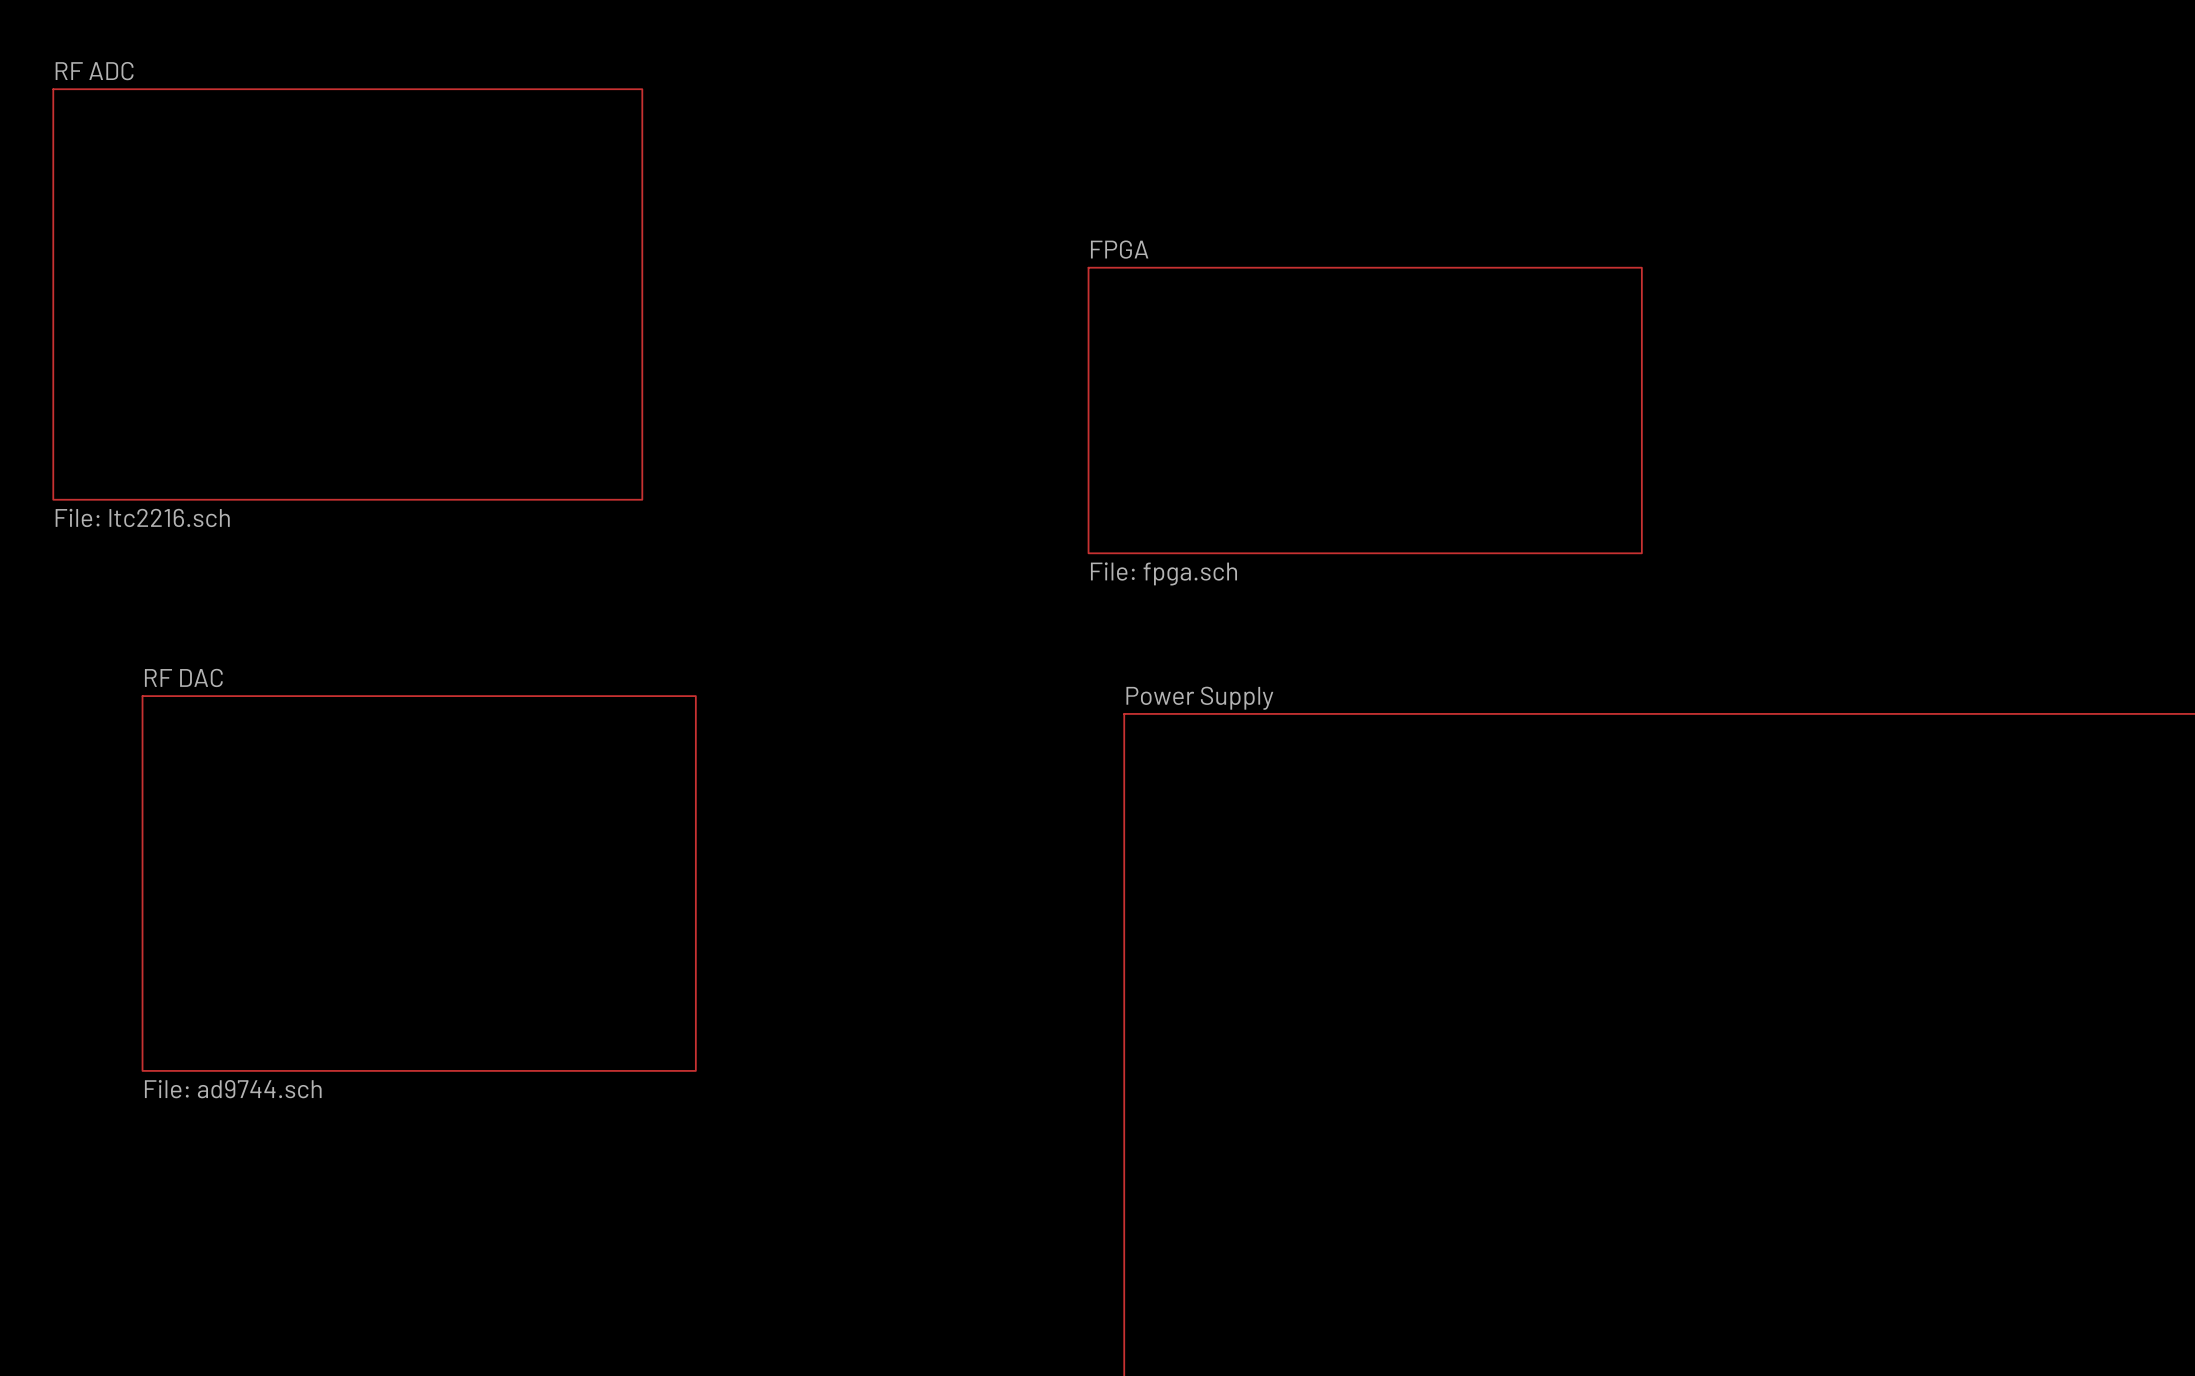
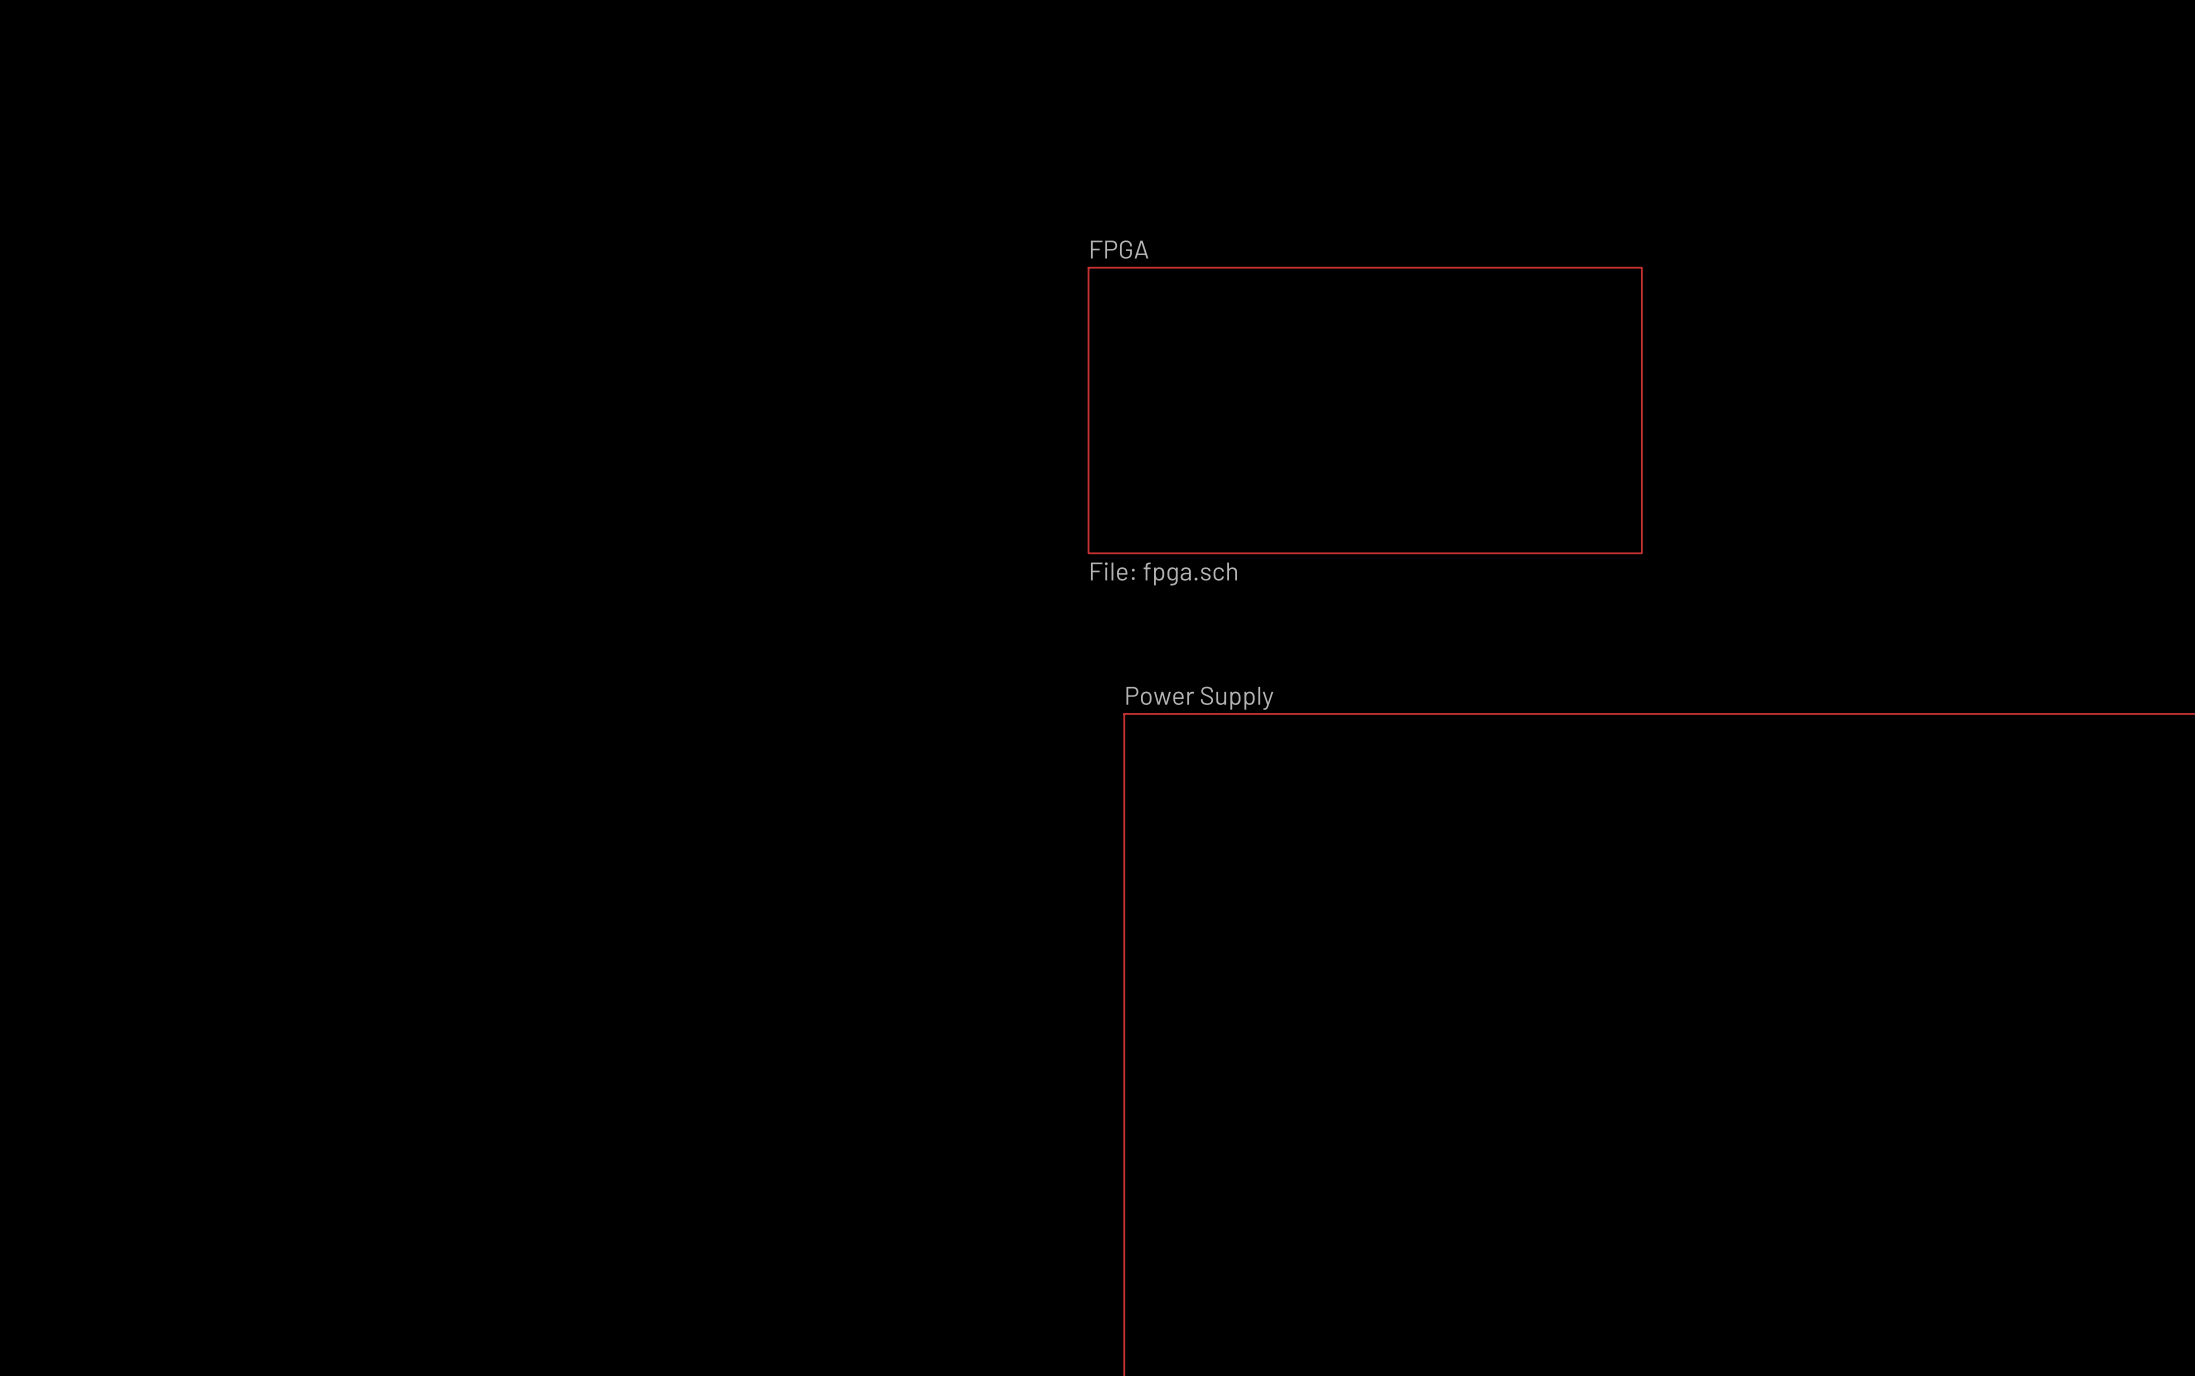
sheet RF ADC: File: ltc2216.sch (347, 294) -> none
sheet RF DAC: File: ad9744.sch (419, 883) -> none

